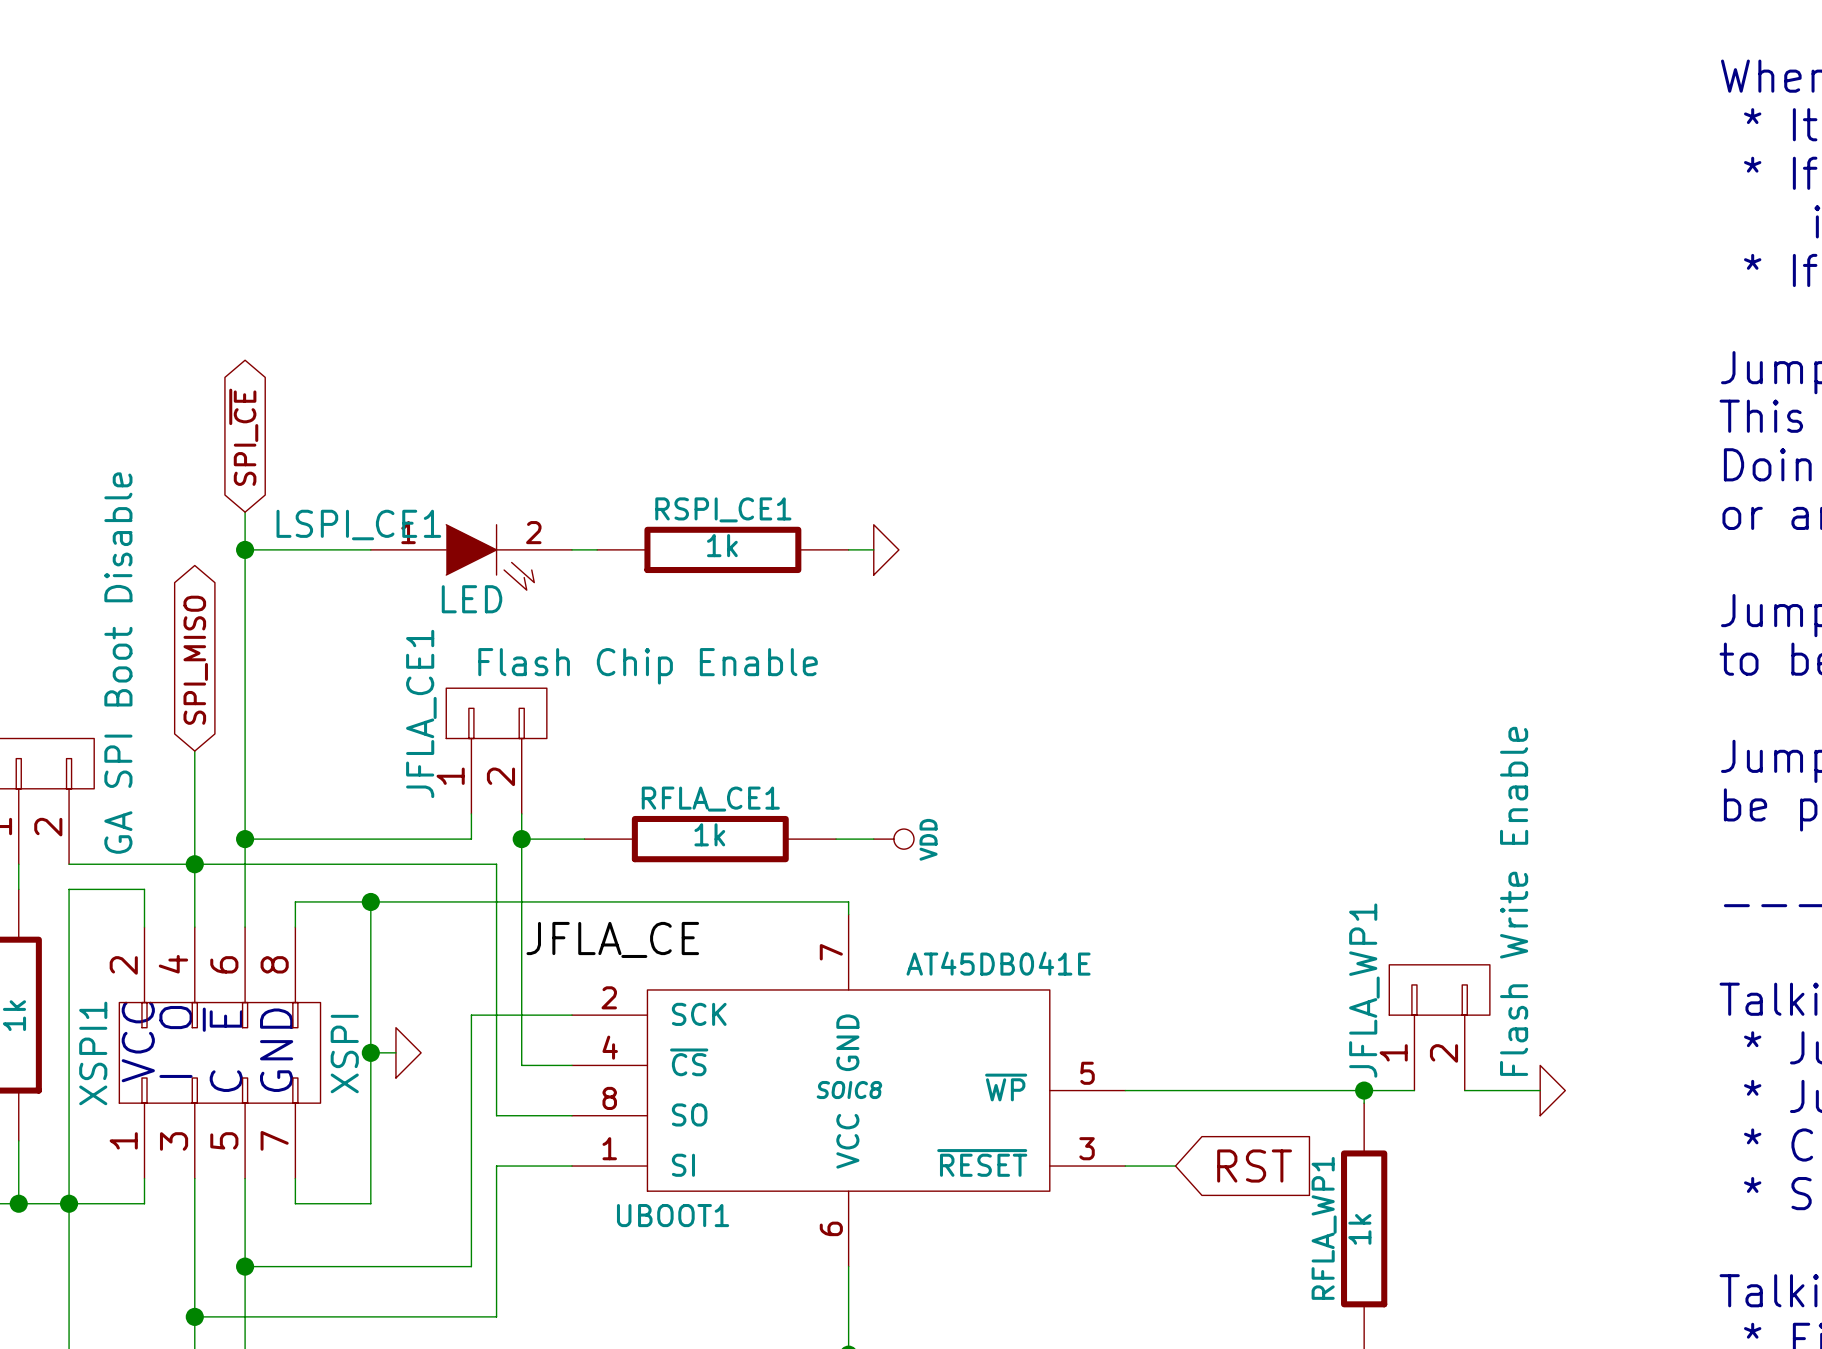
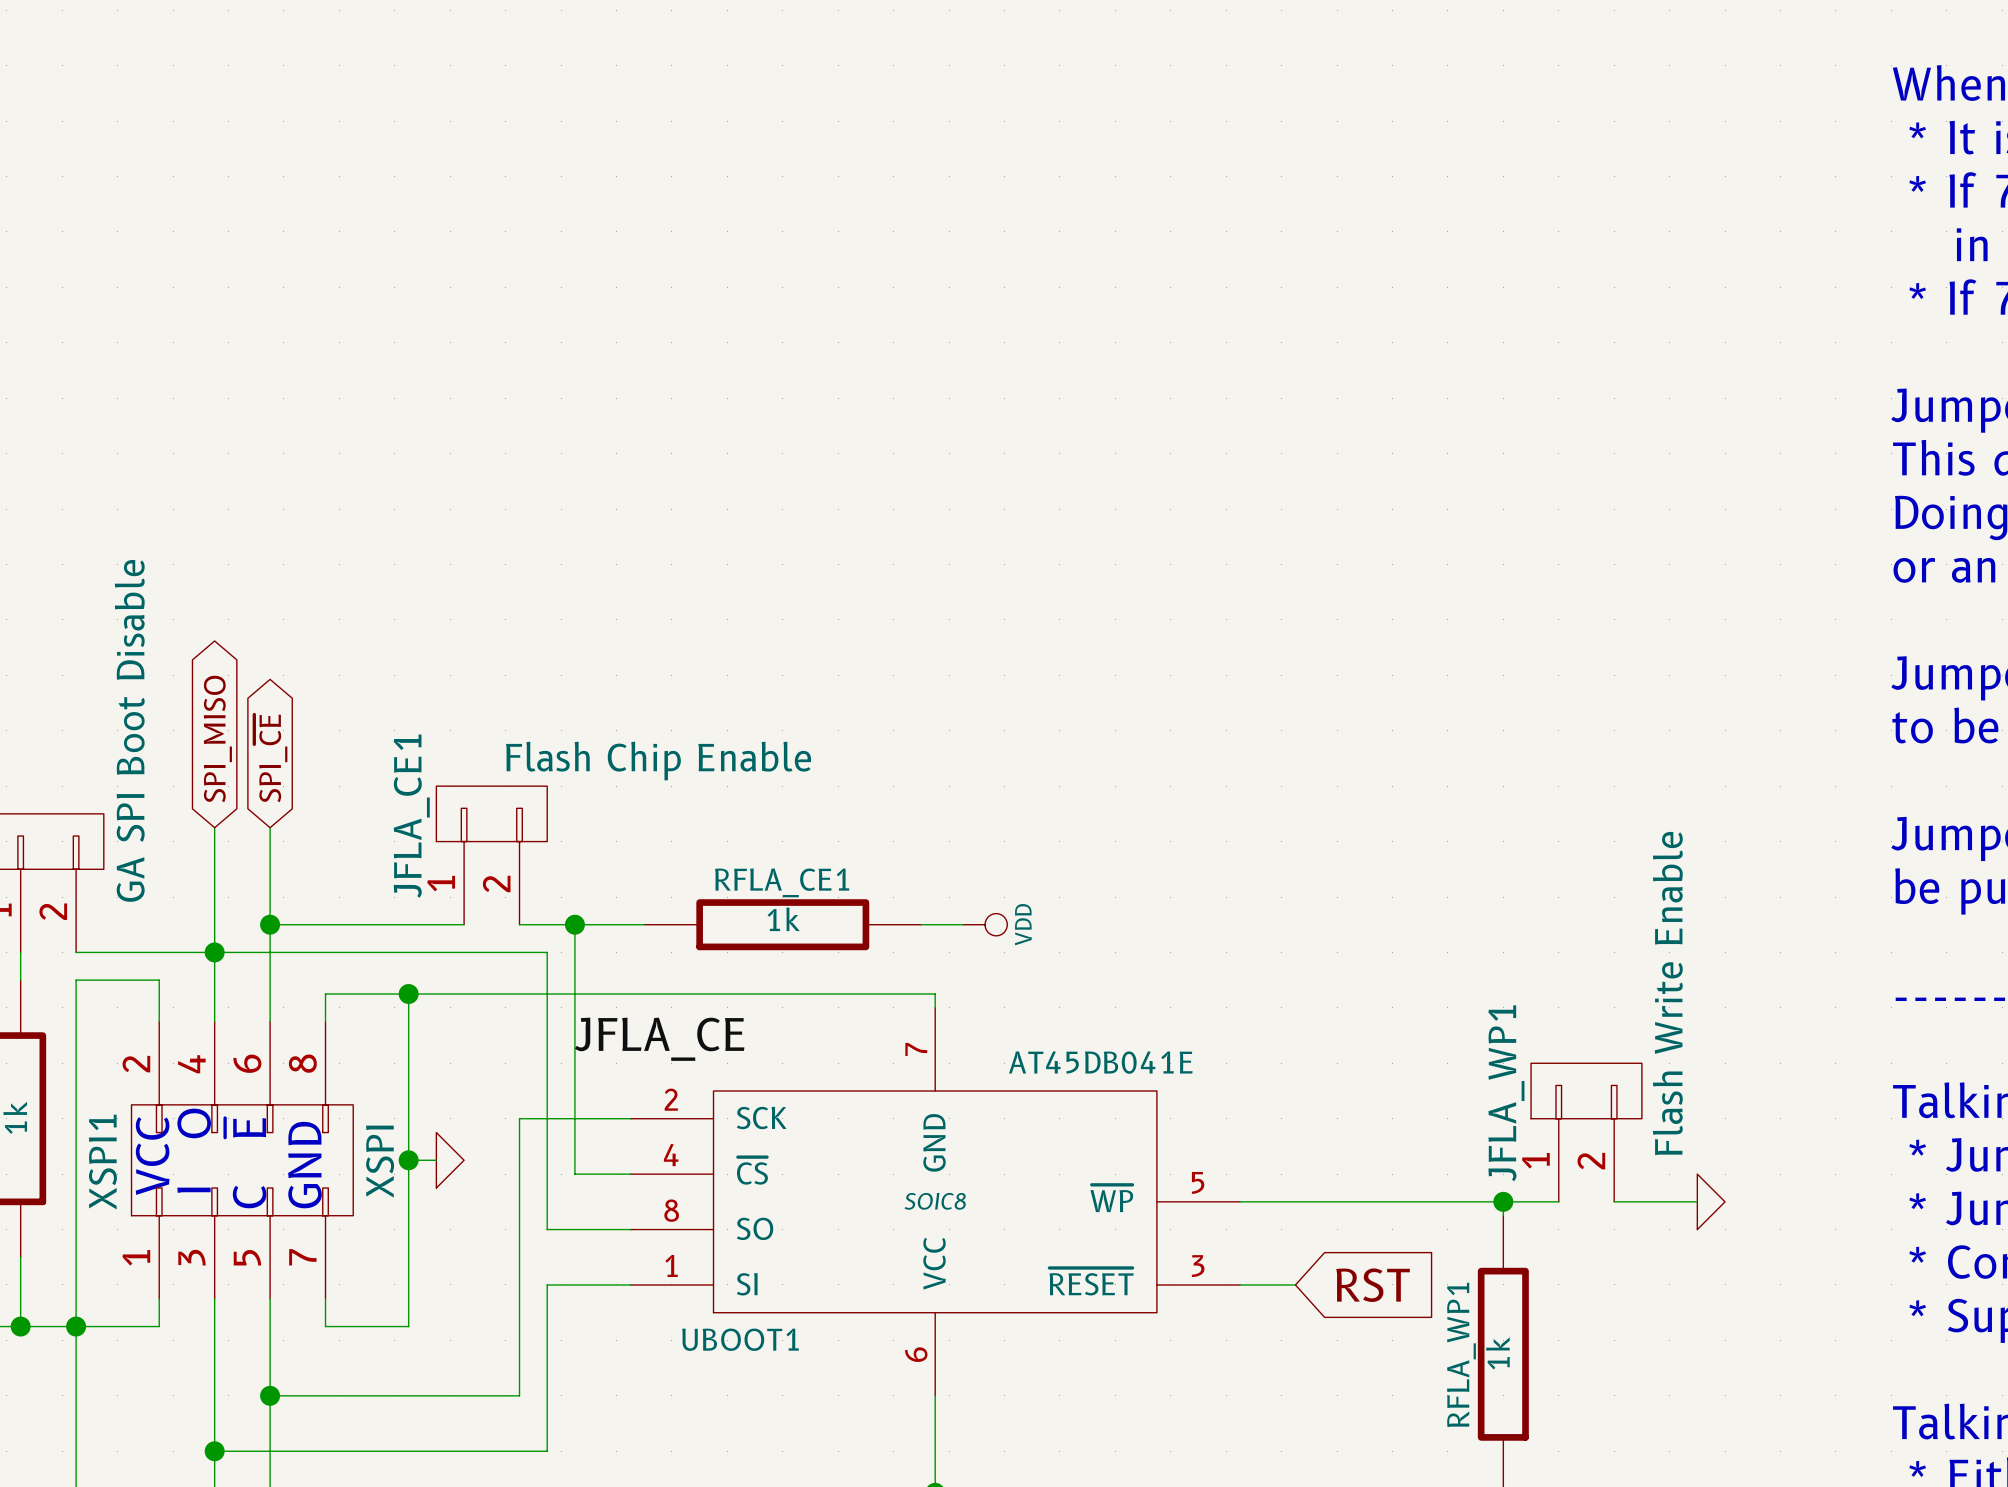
global label position: SPI_~{CE} (243, 437) -> SPI_~{CE} (270, 758)
wire: (245, 512) (245, 751) -> none
wire: (245, 549) (370, 549) -> none
junction: (245, 549) -> none
wire: (572, 549) (597, 549) -> none
RSPI_CE1: 1k (722, 549) -> none
wire: (848, 549) (873, 549) -> none
power symbol: (886, 549) -> none
LSPI_CE1: LED (471, 557) -> none
JFLA_CE1 position: (496, 751) -> (491, 855)
wire: (471, 813) (471, 839) (421, 839) -> none
wire: (521, 813) (521, 839) -> (519, 924) (574, 924)

